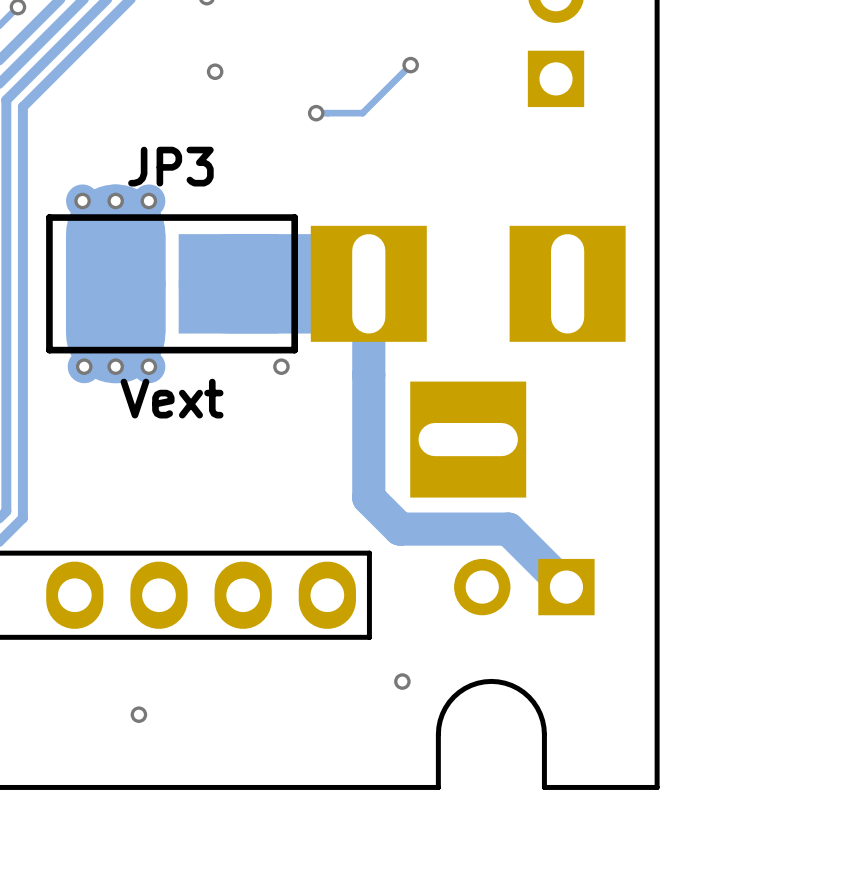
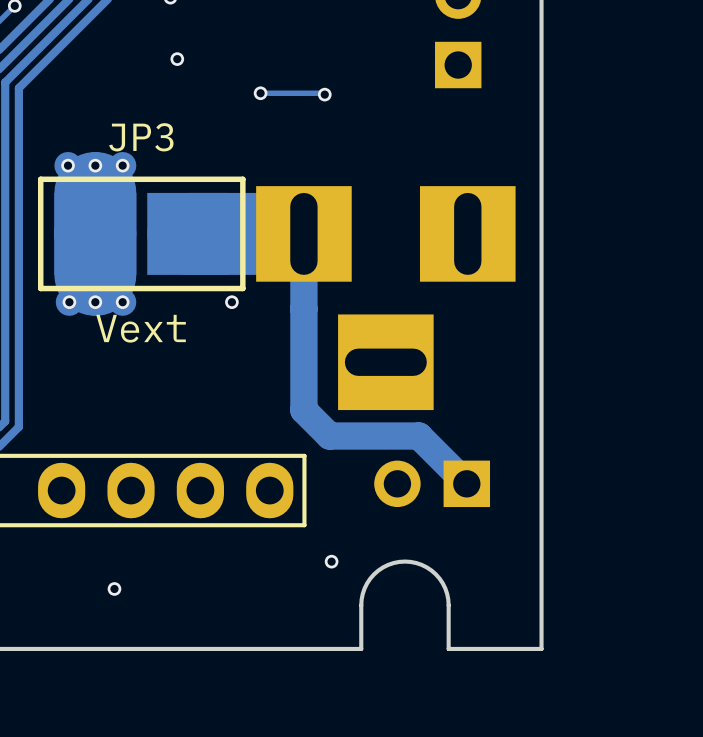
track: (410, 65) (362, 113) -> (324, 94) (298, 93)
via position: (410, 65) -> (324, 94)

